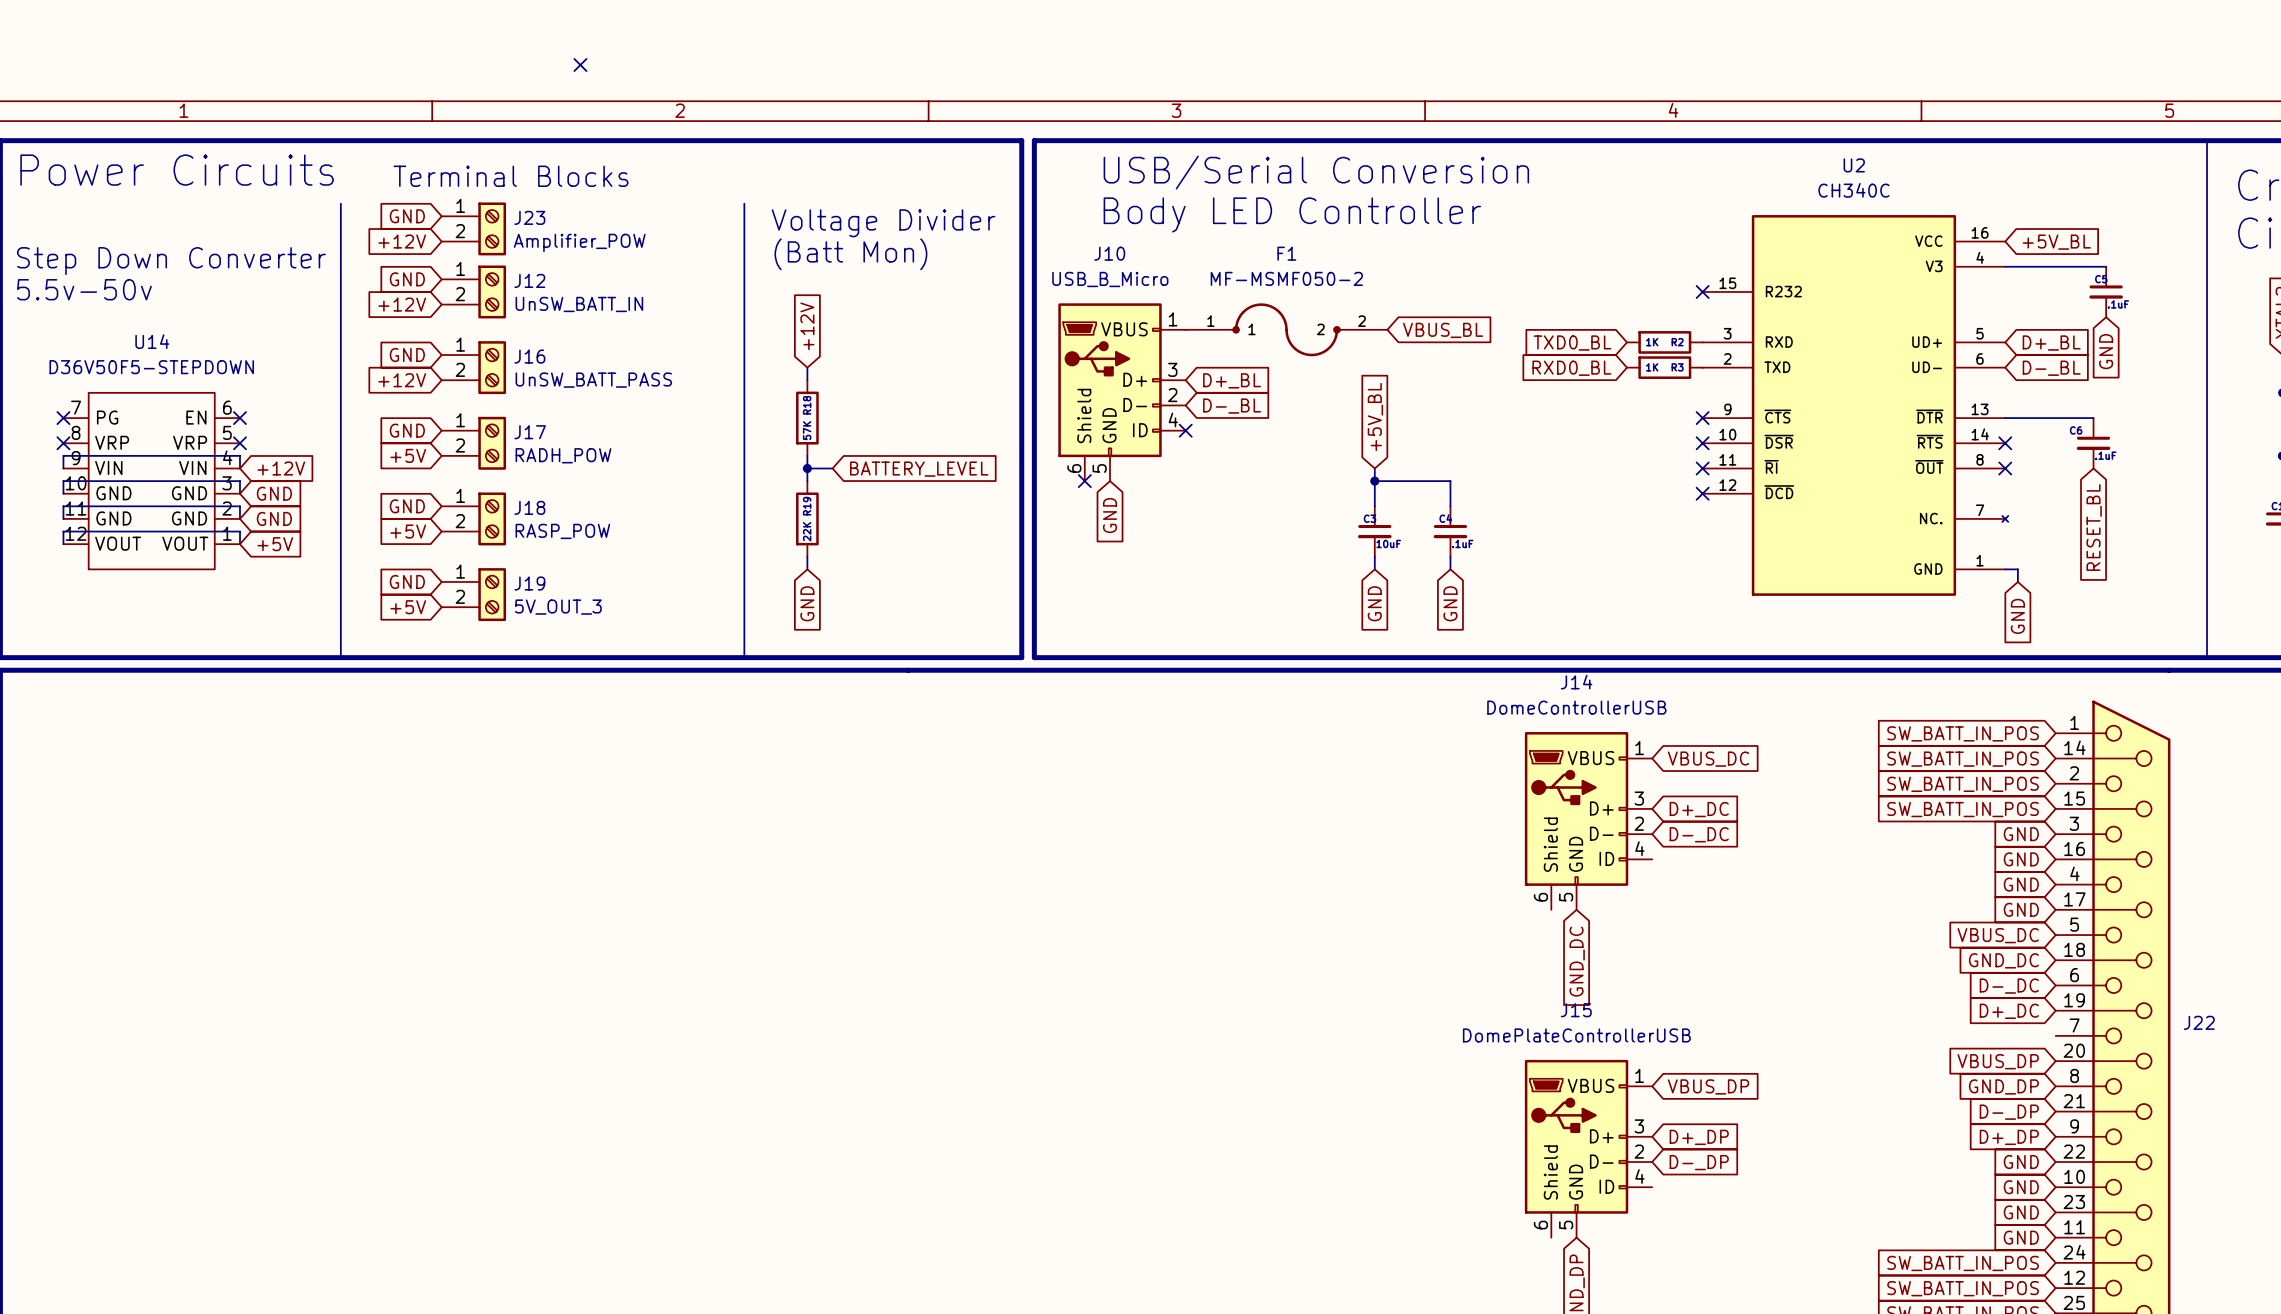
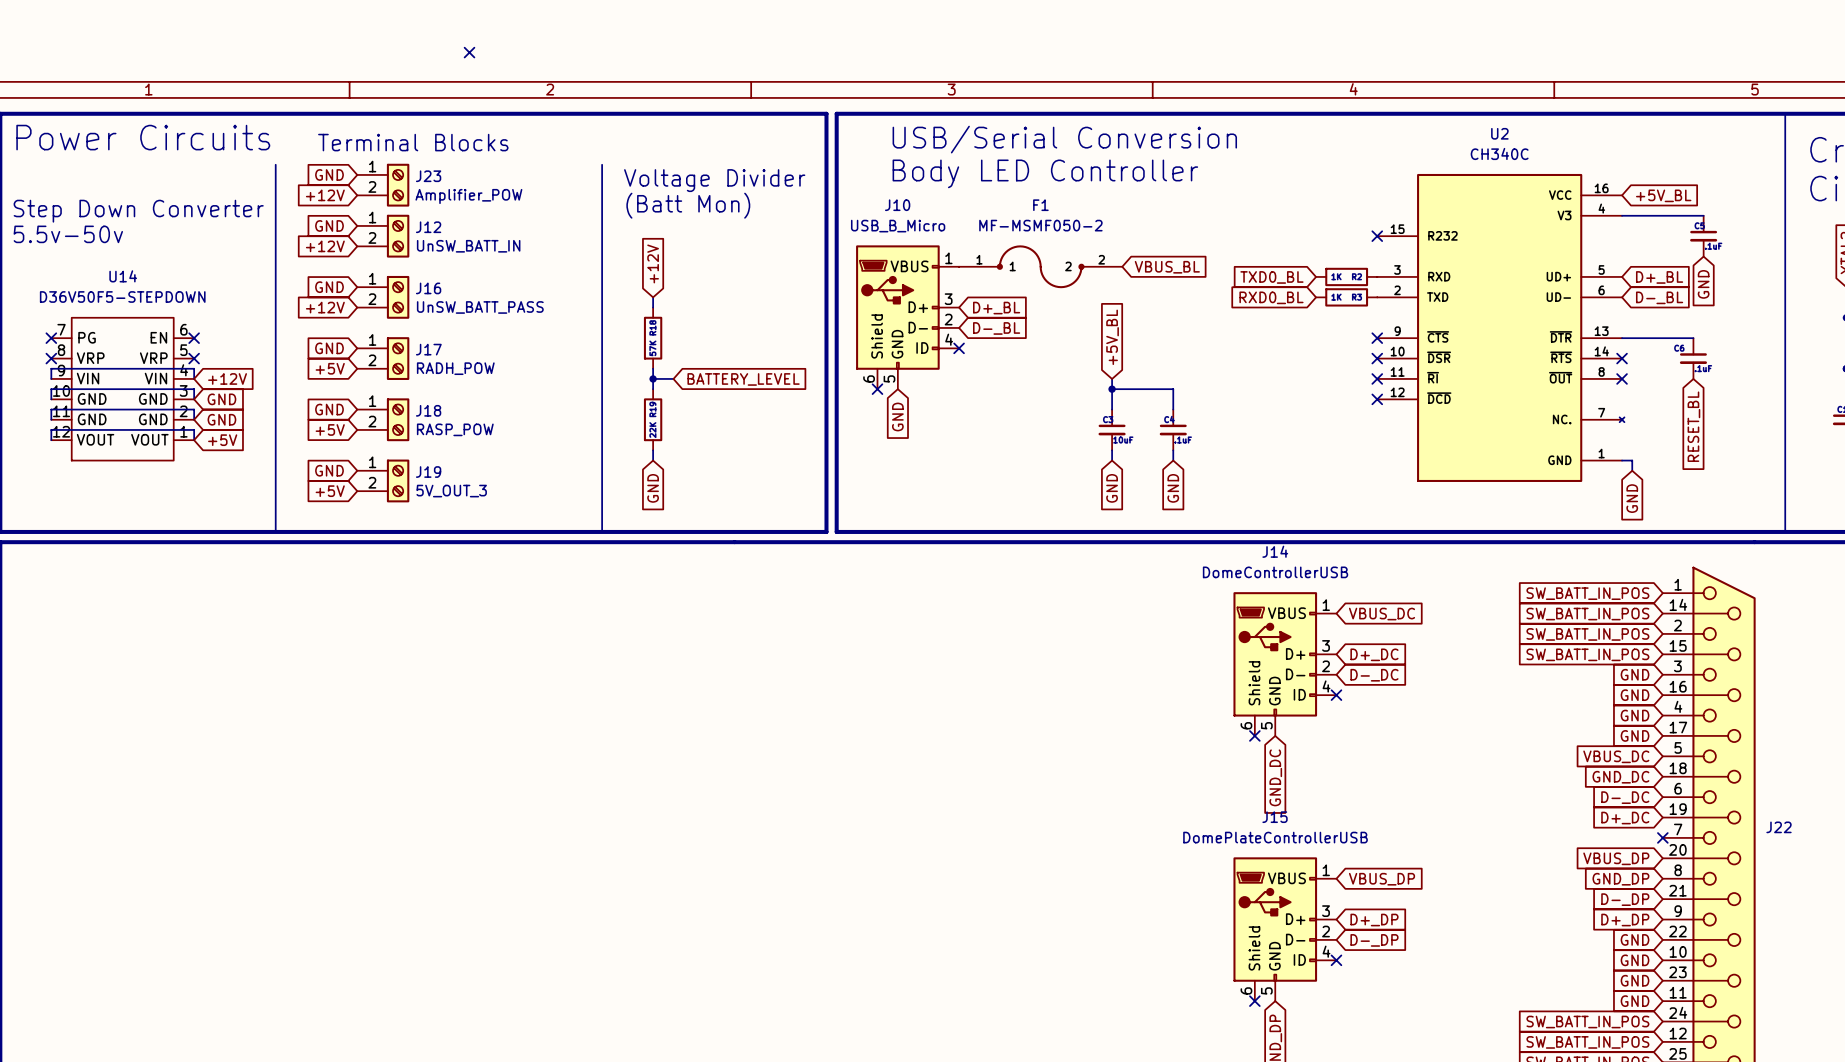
no-connect mark: none -> (1336, 695)
no-connect mark: none -> (1254, 735)
no-connect mark: none -> (1662, 837)
no-connect mark: none -> (1336, 960)
no-connect mark: none -> (1254, 1001)

